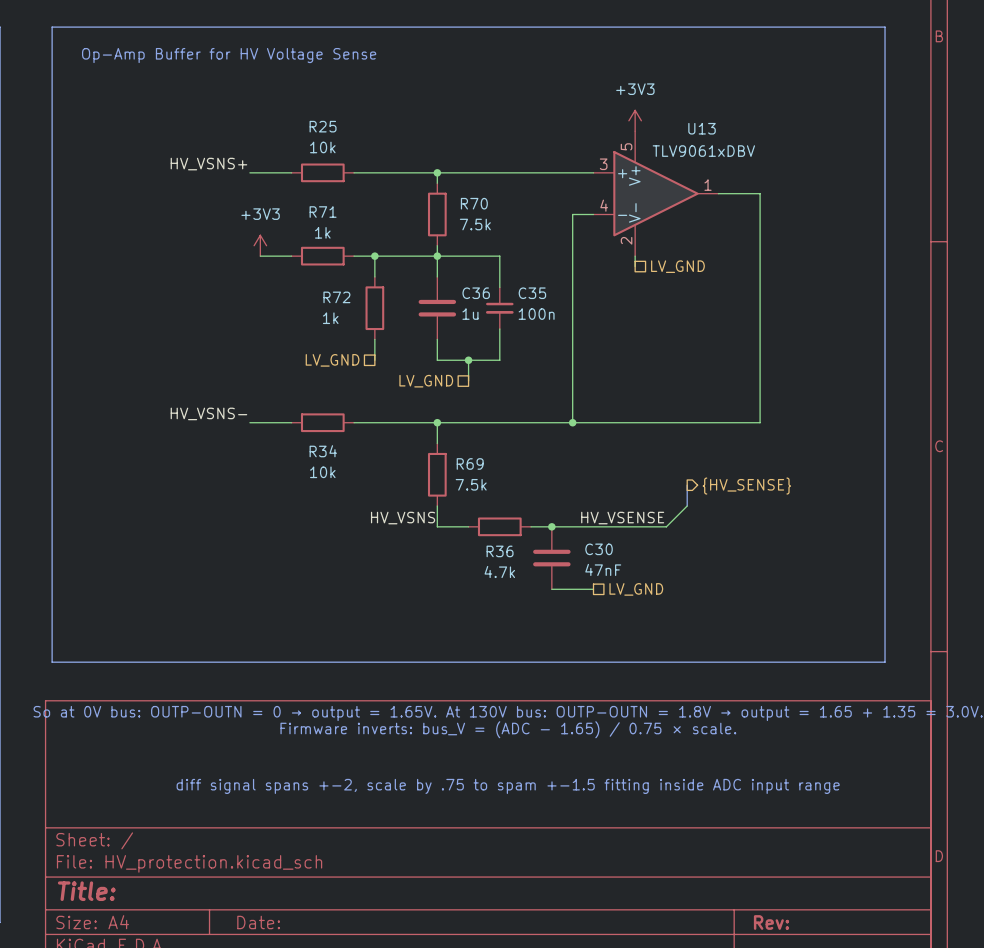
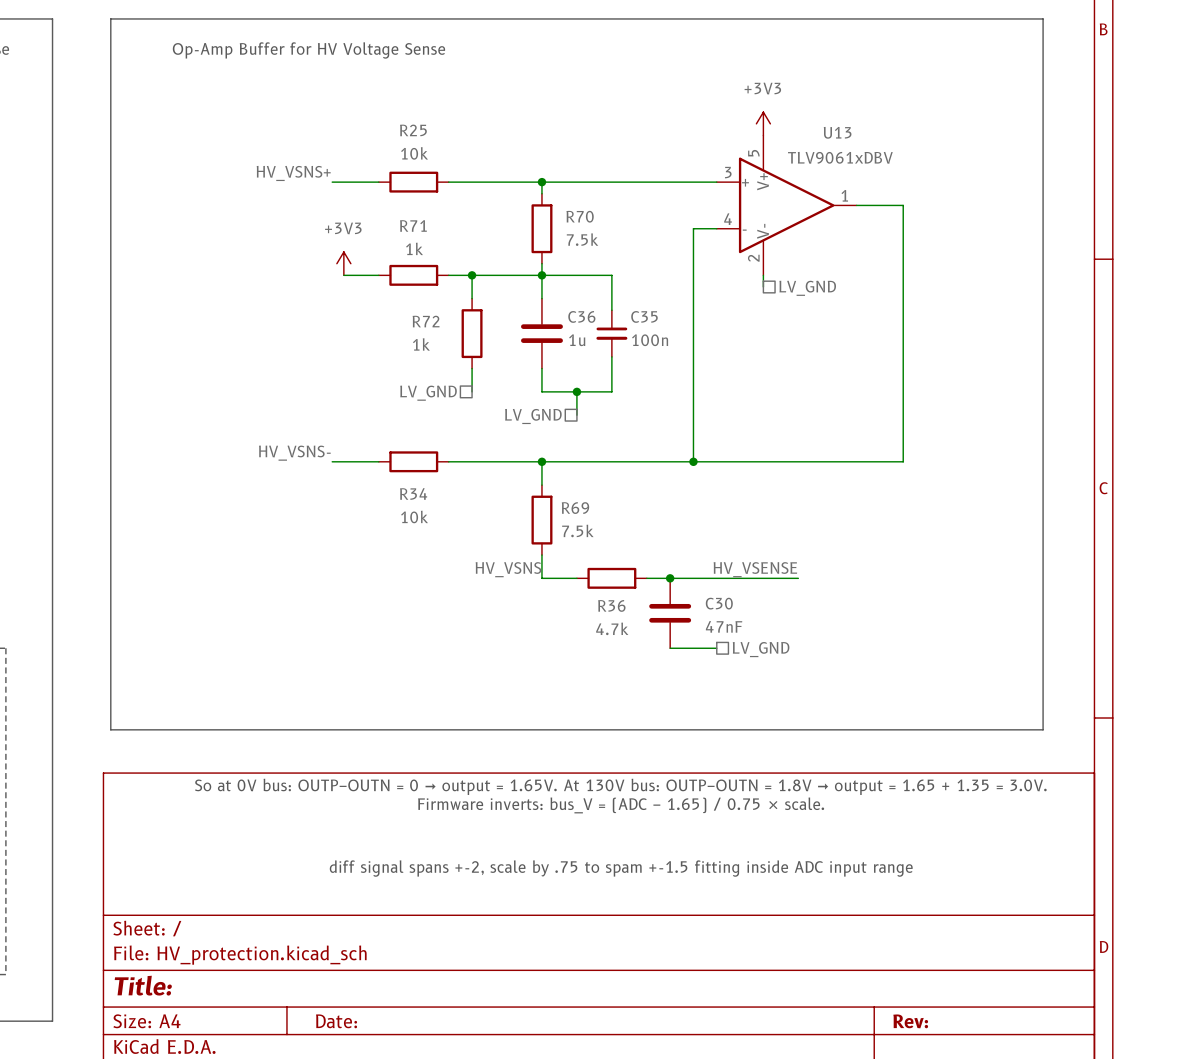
bus: (687, 485) (687, 506) -> none
hierarchical label: {HV_SENSE} (746, 486) -> none
wire: (687, 506) (666, 526) -> none

